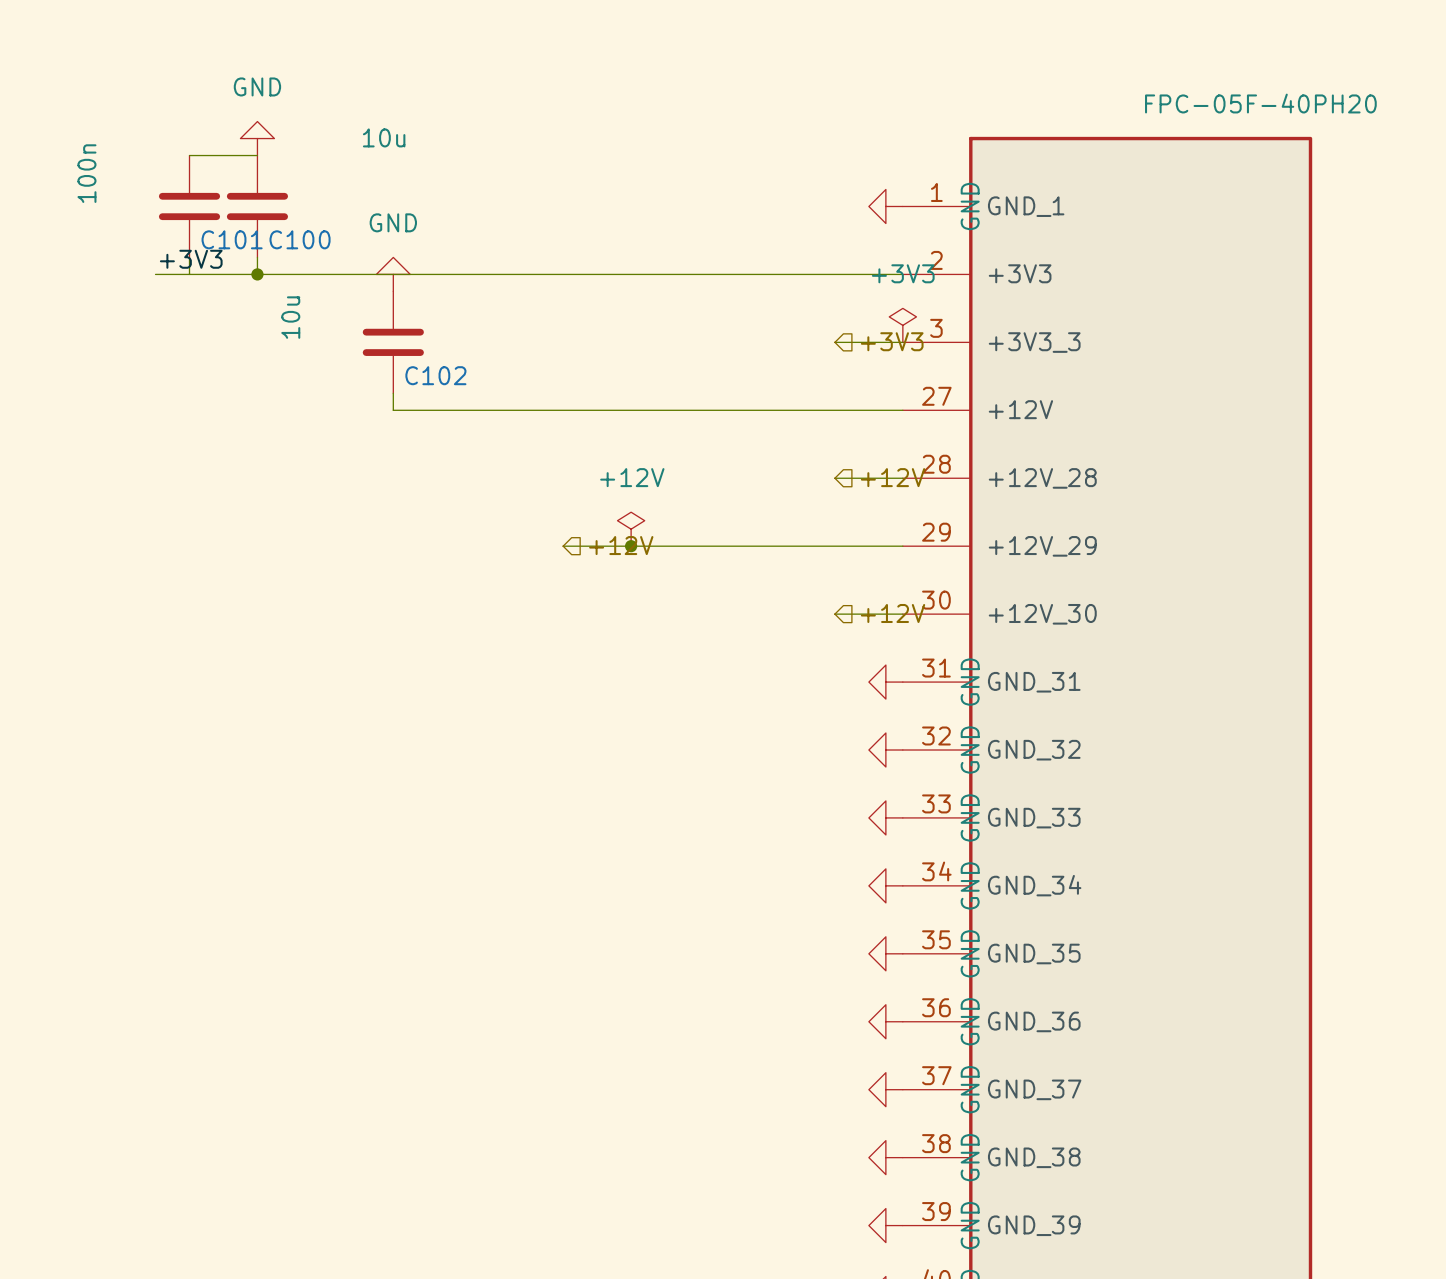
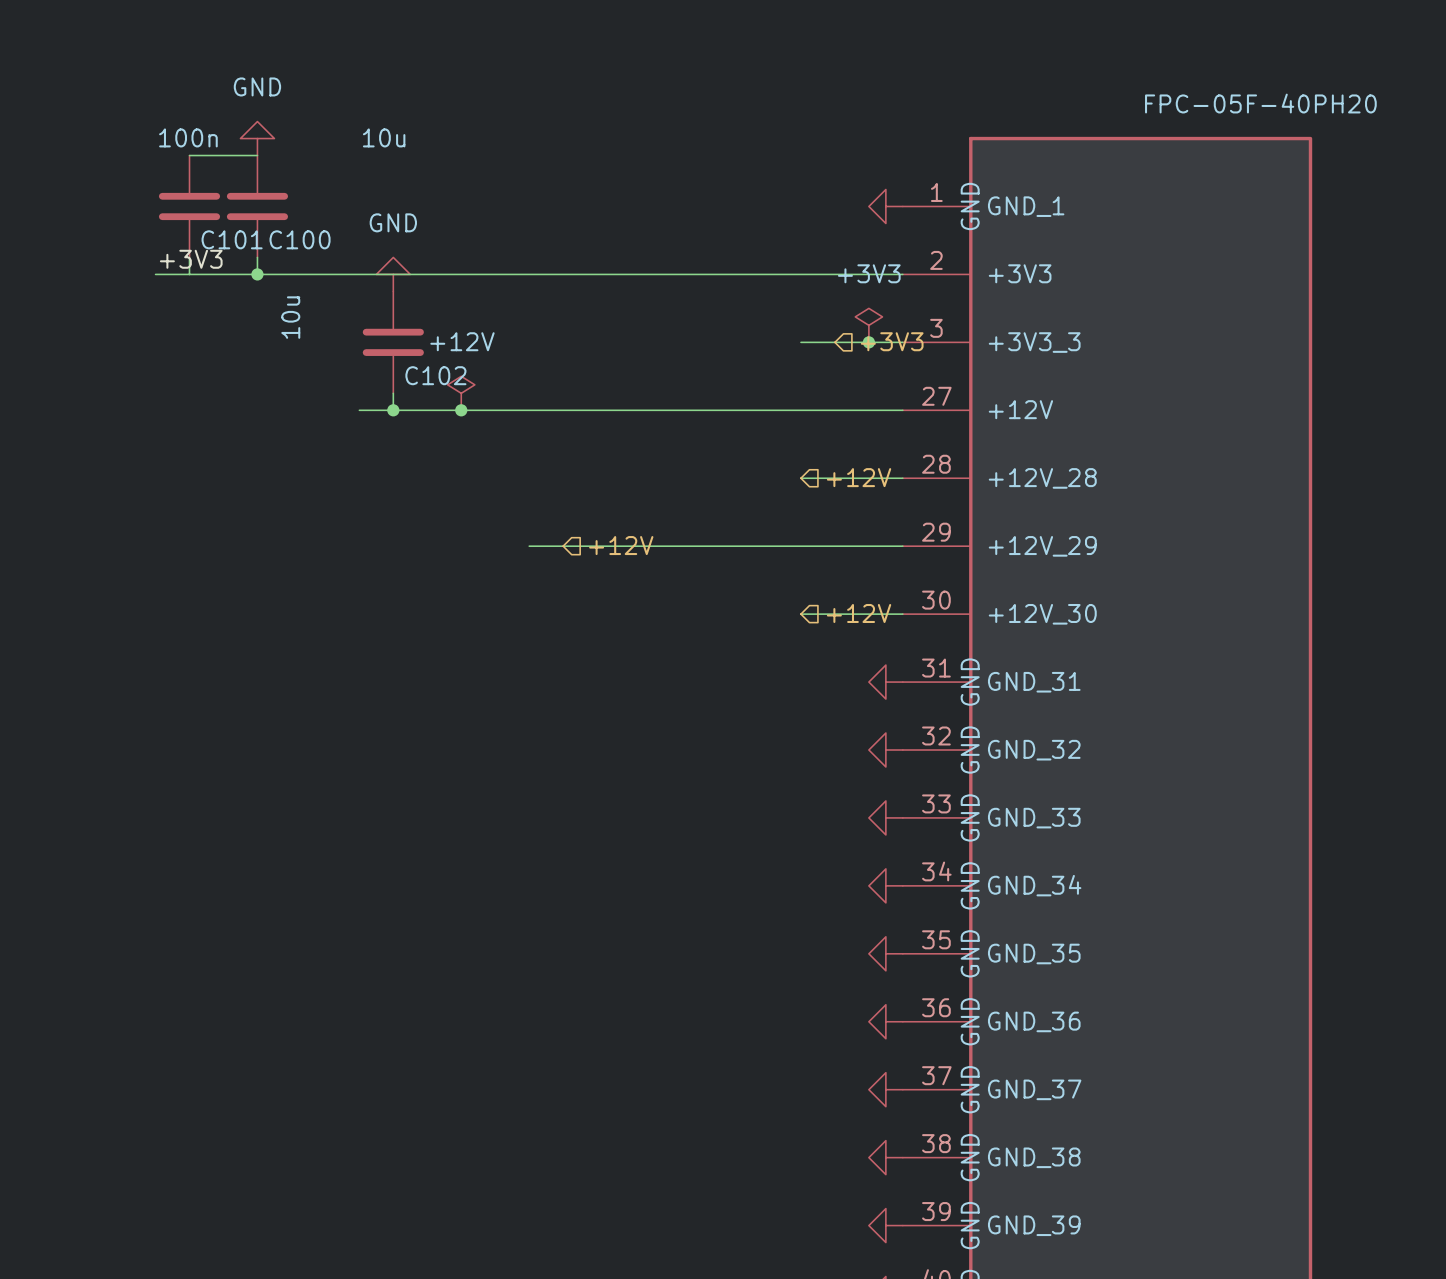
C101 value rotation: 0° (86, 173) -> 90° clockwise (188, 137)
C101 value position: 100n (86, 173) -> 100n (188, 137)
power symbol position: +3V3 (902, 325) -> +3V3 (868, 325)
wire: none -> (800, 342) (834, 342)
junction: none -> (868, 342)
wire: none -> (359, 410) (393, 410)
junction: none -> (393, 410)
junction: none -> (461, 410)
hierarchical label position: +12V (893, 477) -> +12V (859, 477)
wire: none -> (800, 478) (834, 478)
power symbol position: +12V (631, 529) -> +12V (461, 393)
wire: none -> (529, 546) (563, 546)
junction: (631, 546) -> none
hierarchical label position: +12V (893, 613) -> +12V (859, 613)
wire: none -> (800, 614) (834, 614)

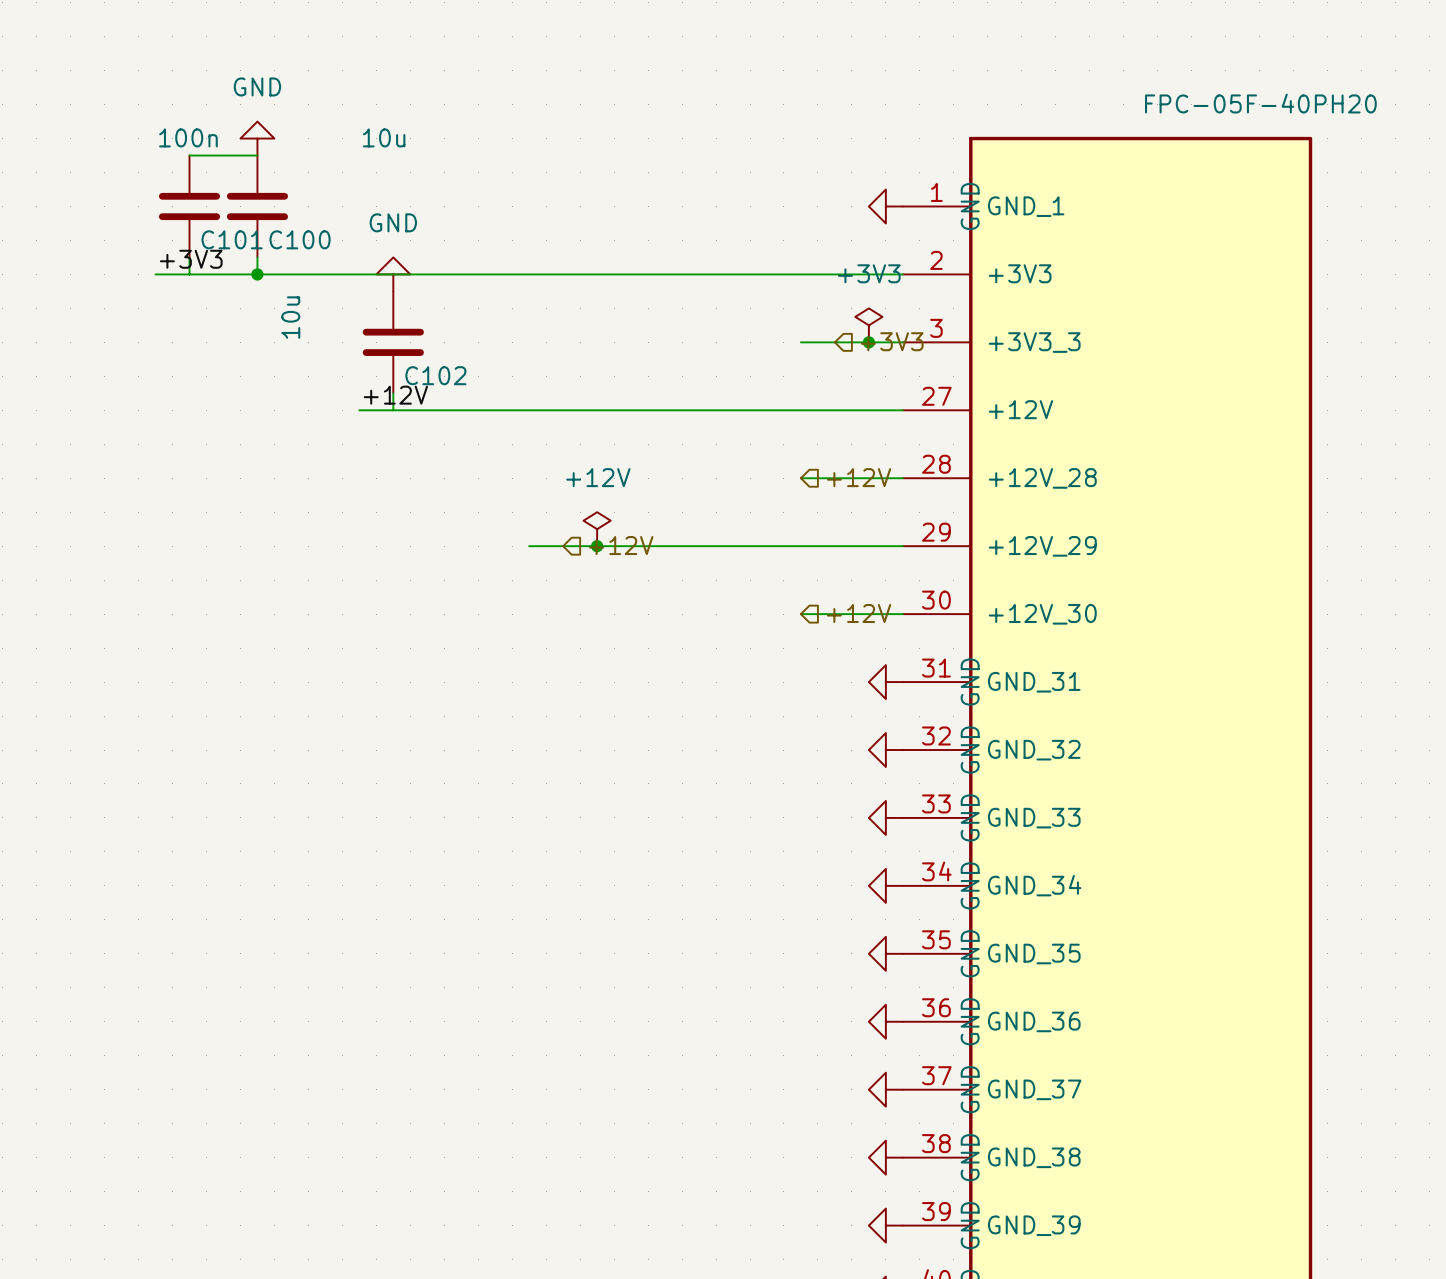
power symbol position: +12V (461, 393) -> +12V (597, 529)
label: none -> +12V (395, 395)
junction: (393, 410) -> none
junction: (461, 410) -> none
junction: none -> (597, 546)

